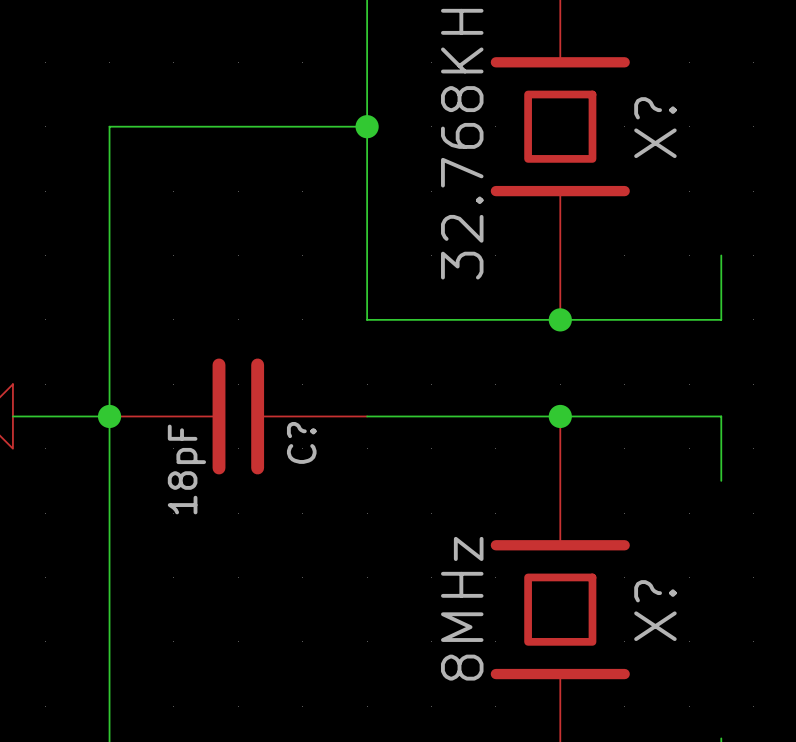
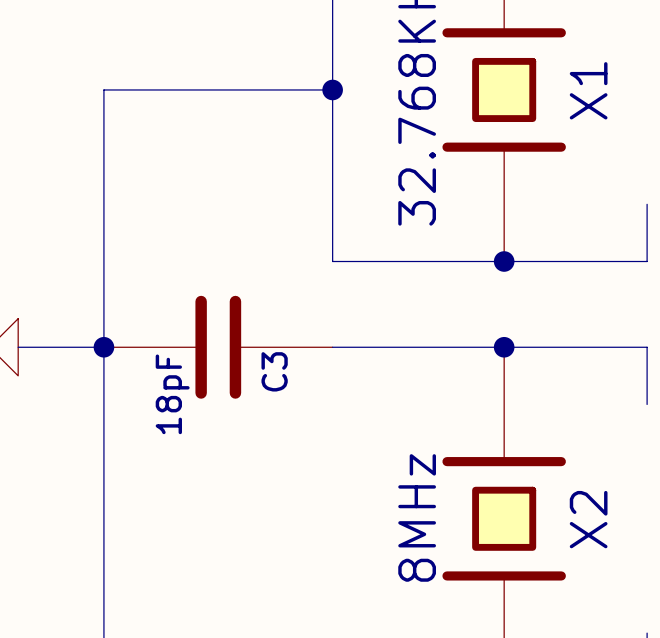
X? name: X? (655, 127) -> X1 (588, 90)
C? name: C? (301, 442) -> C3 (274, 371)
X? name: X? (655, 610) -> X2 (588, 519)

